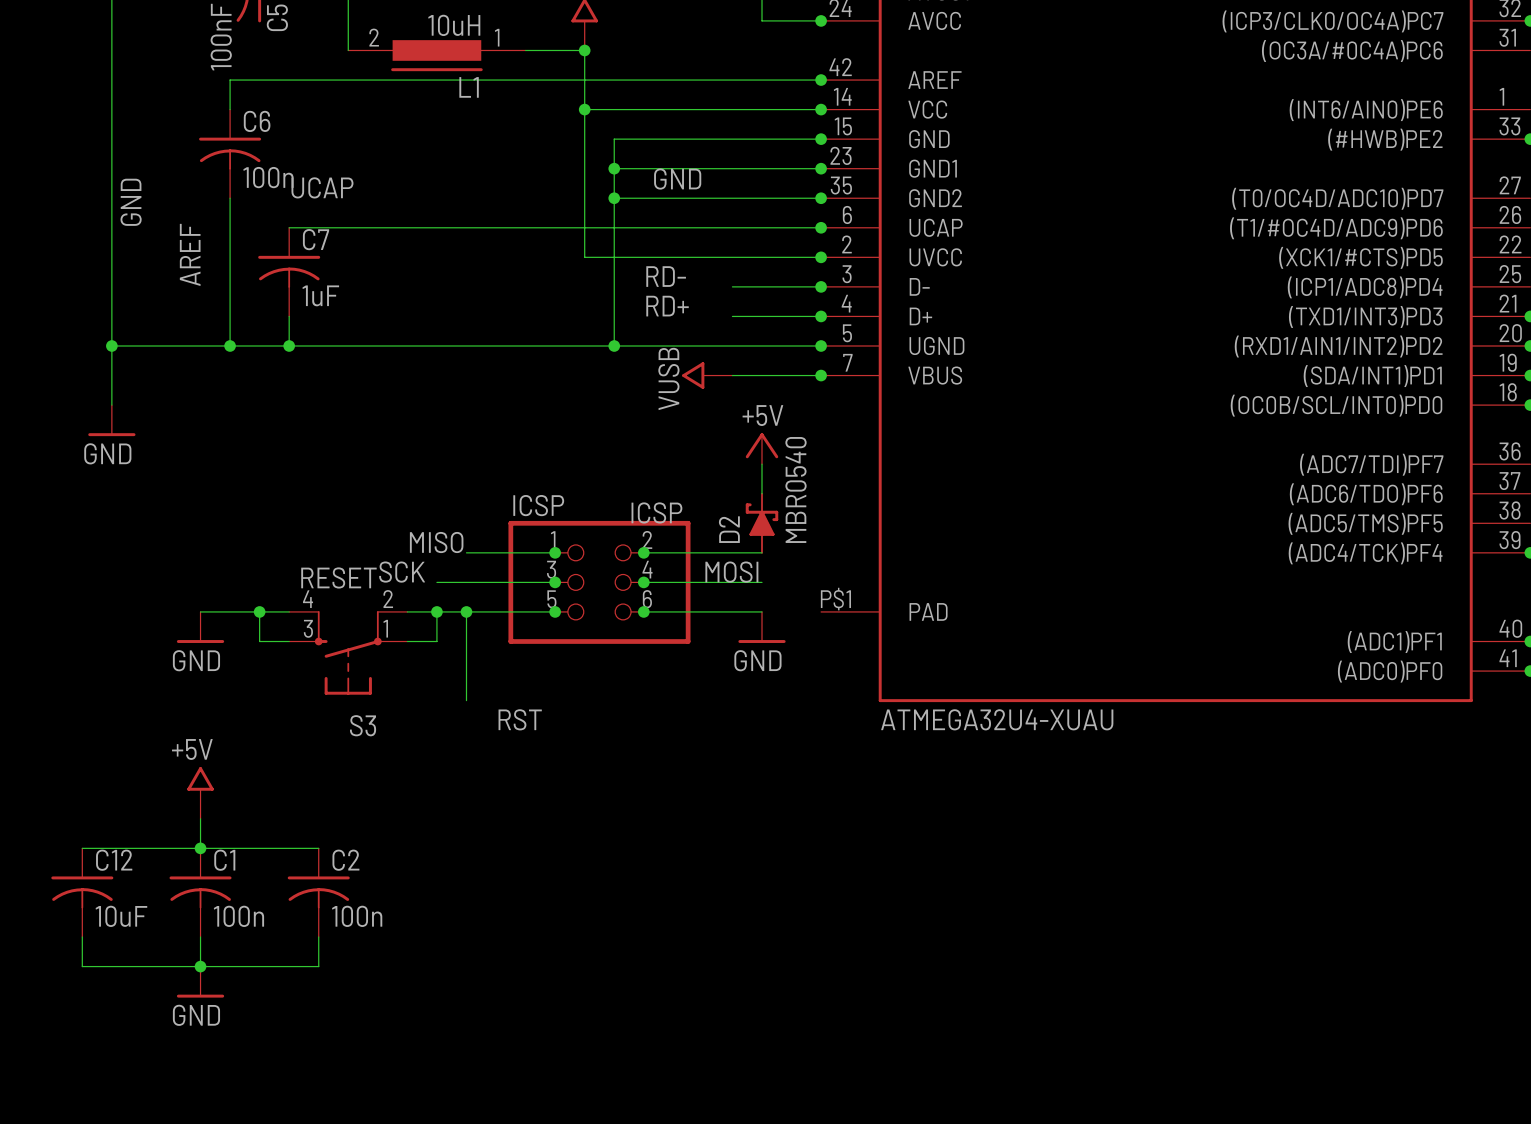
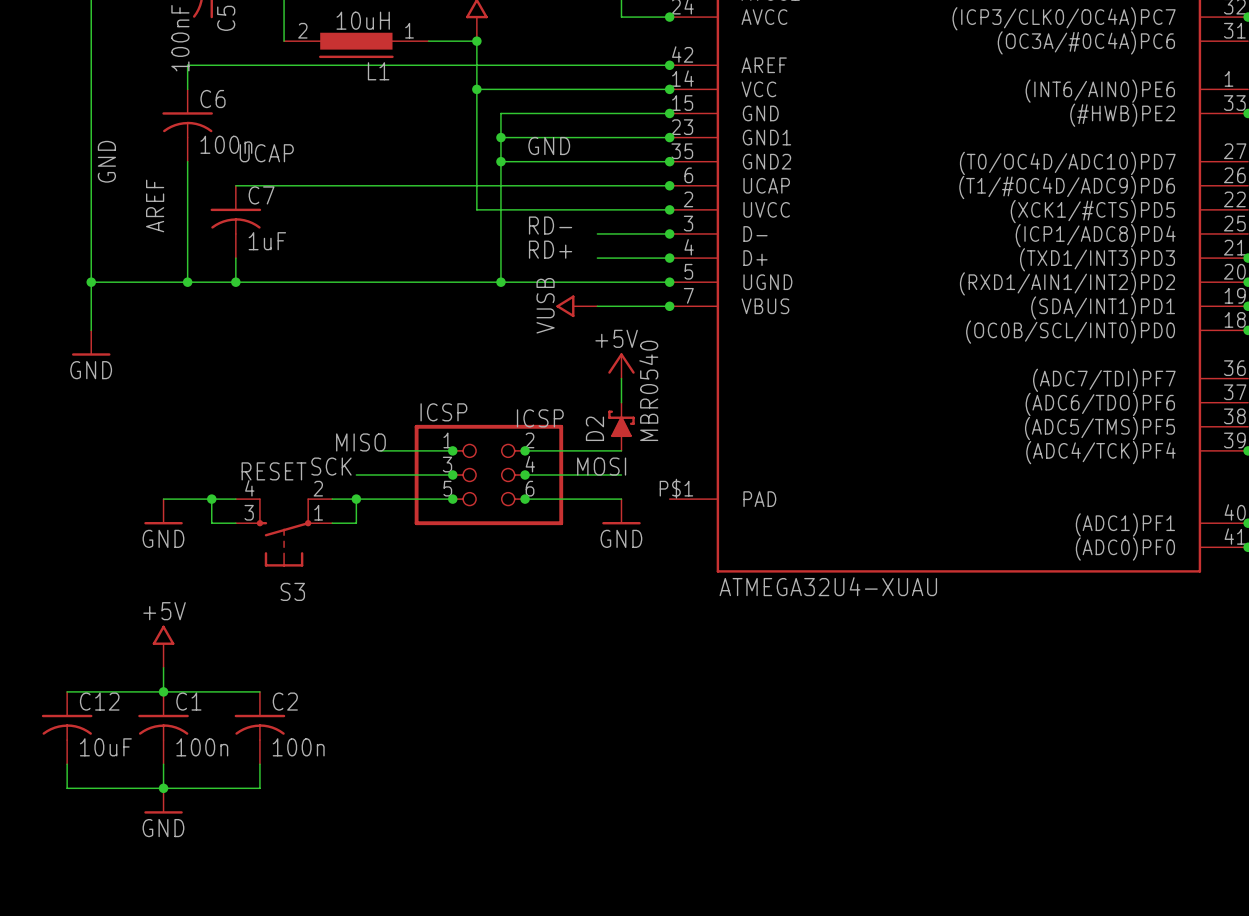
wire: (466, 611) (466, 700) -> none
junction: (466, 611) -> none
label: RST (520, 719) -> none

